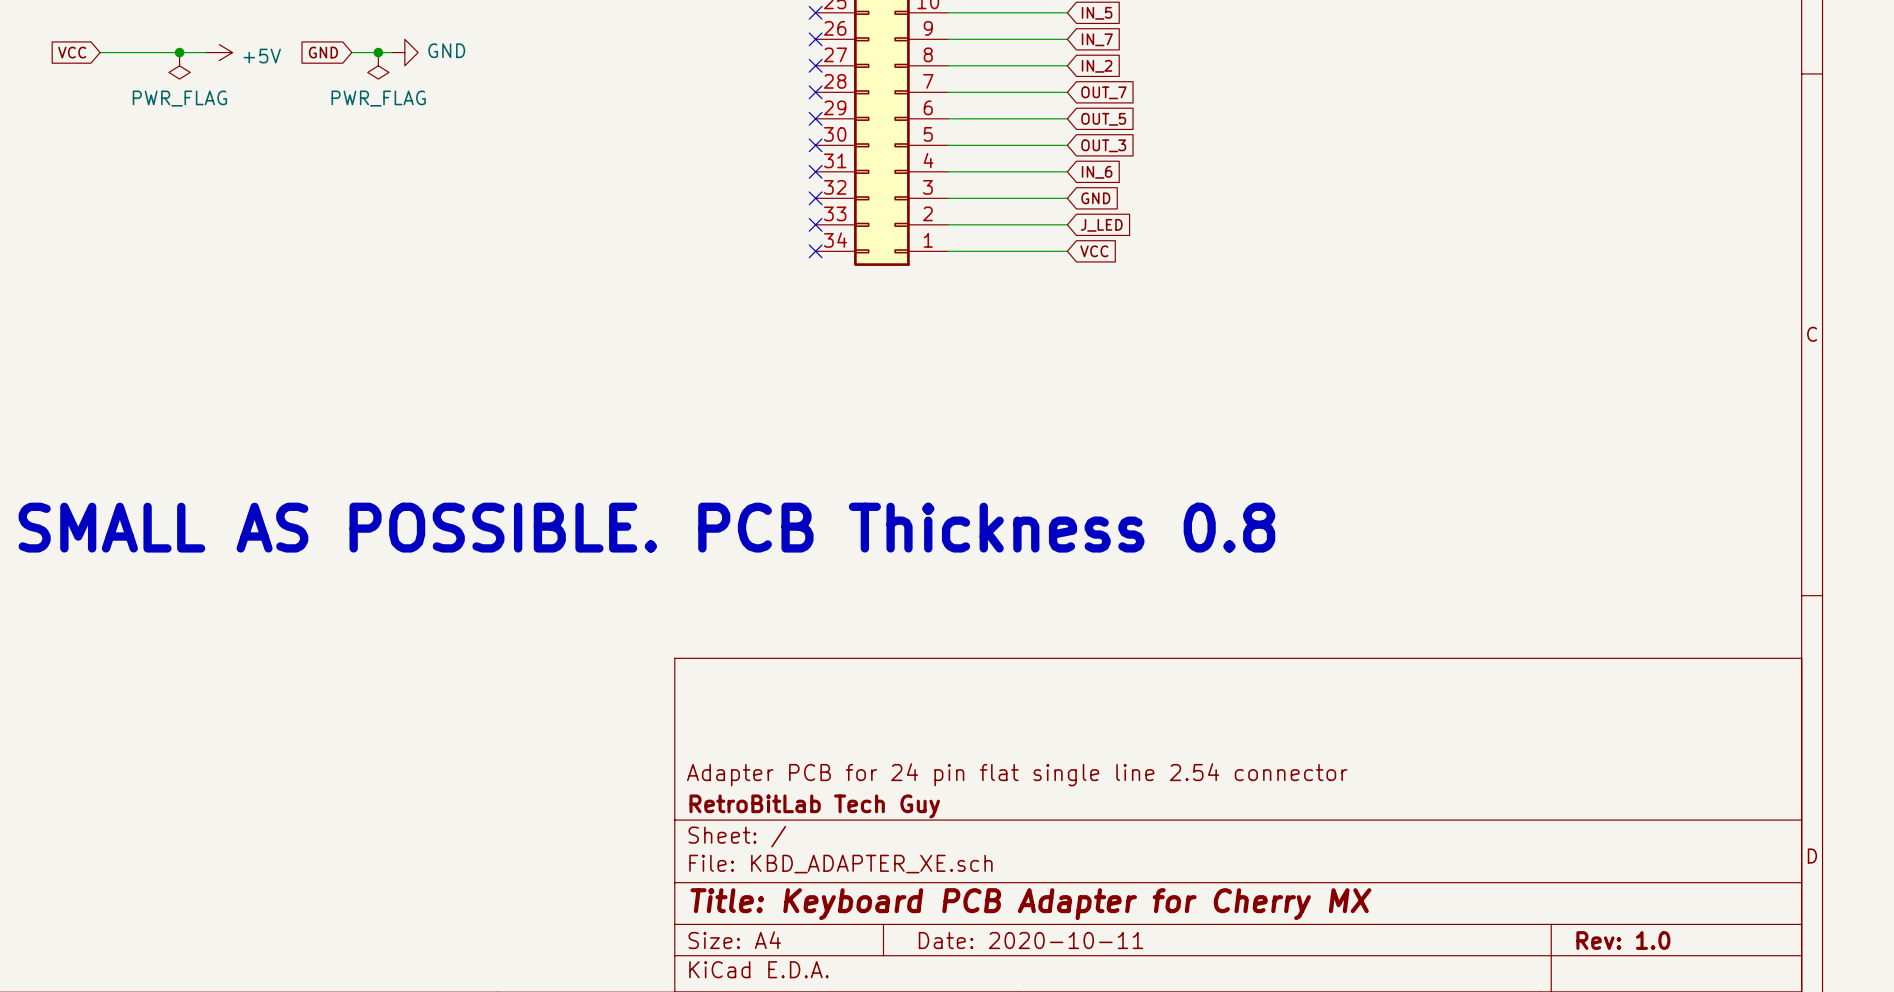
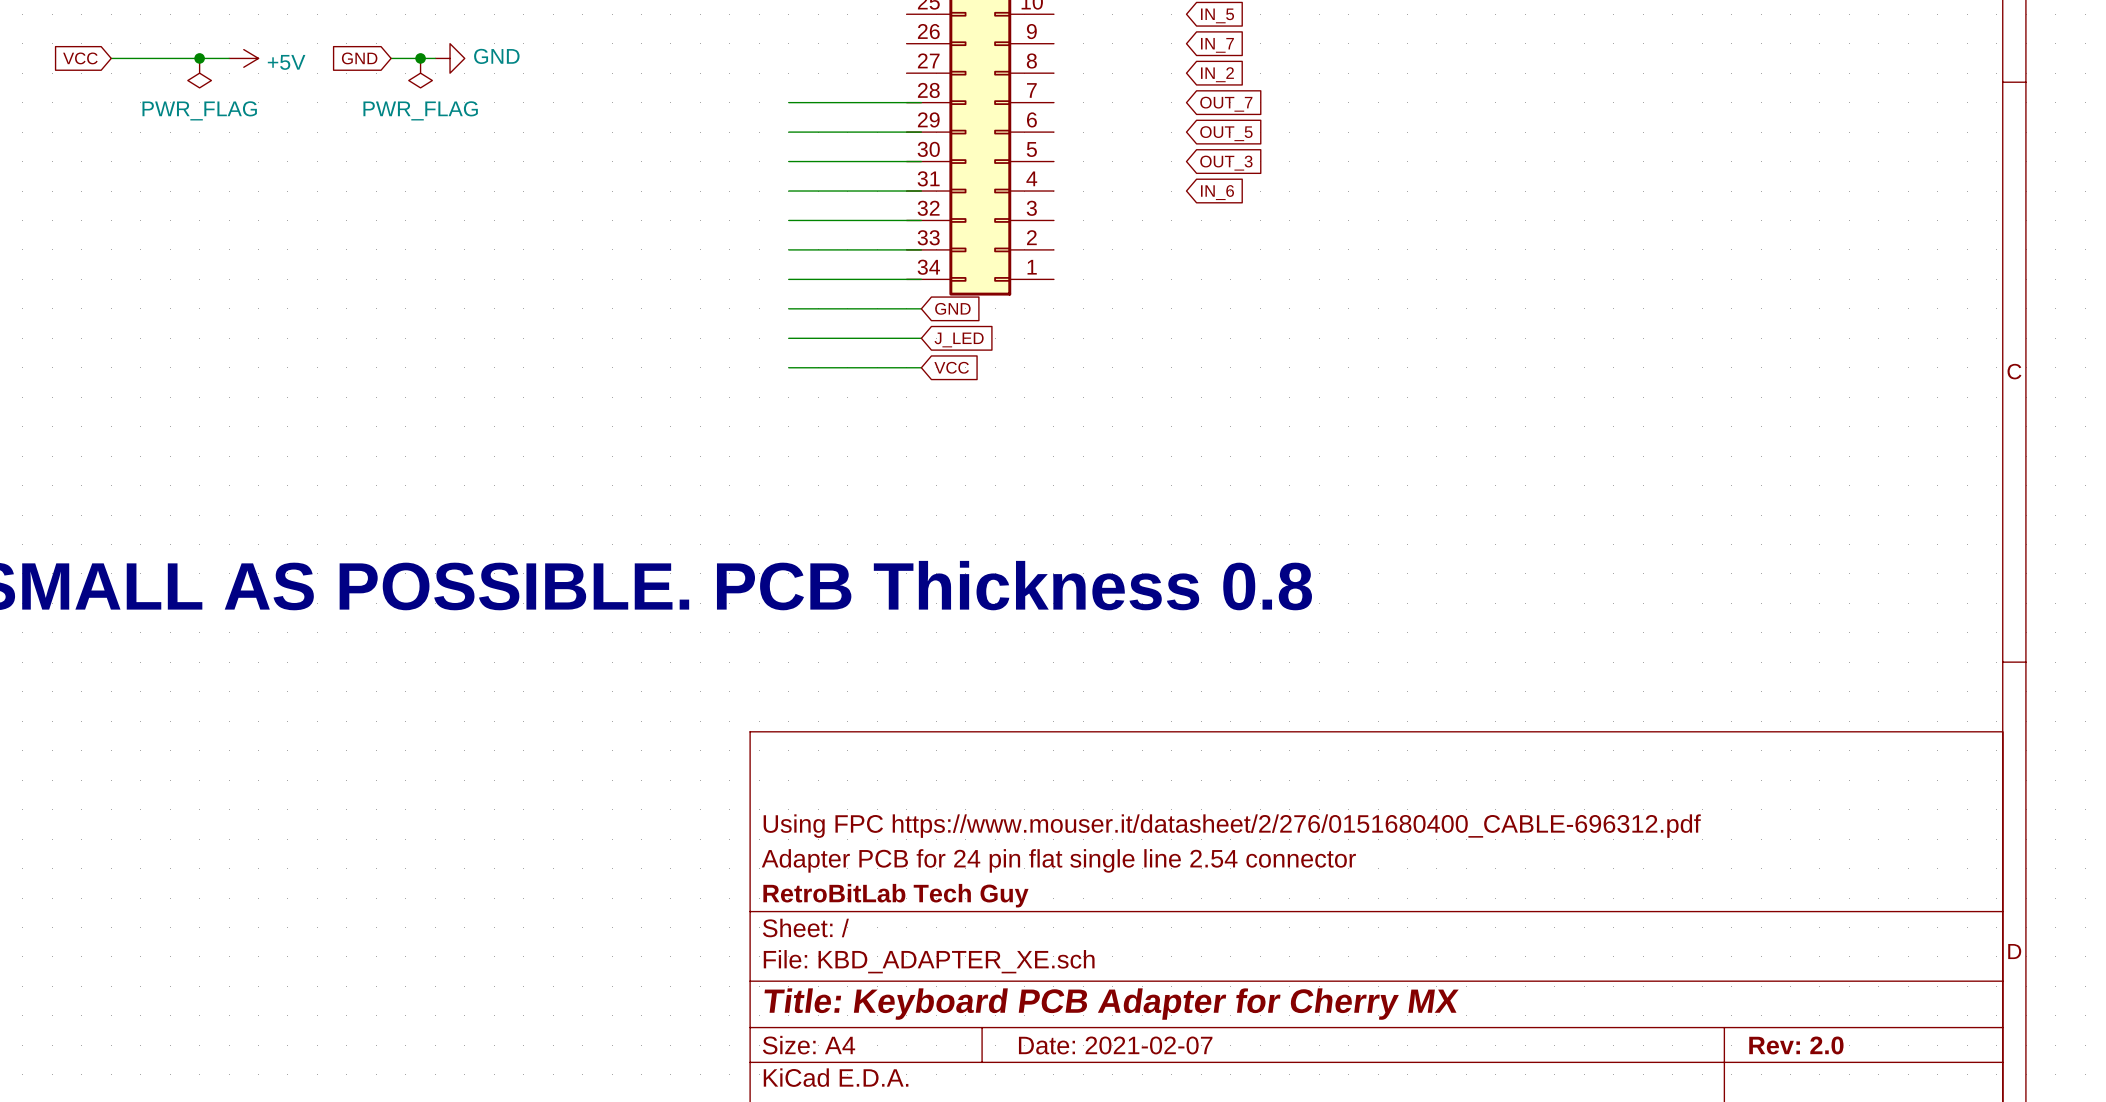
no-connect mark: (815, 12) -> none
wire: (948, 12) (1067, 12) -> (788, 102) (921, 102)
no-connect mark: (815, 39) -> none
wire: (948, 39) (1067, 39) -> (788, 132) (921, 132)
no-connect mark: (815, 65) -> none
wire: (948, 65) (1067, 65) -> (788, 161) (921, 161)
no-connect mark: (815, 92) -> none
wire: (948, 92) (1067, 92) -> (788, 191) (921, 191)
no-connect mark: (815, 118) -> none
wire: (948, 118) (1067, 118) -> (788, 220) (921, 220)
no-connect mark: (815, 145) -> none
wire: (948, 145) (1067, 145) -> (788, 249) (921, 249)
no-connect mark: (815, 171) -> none
wire: (948, 171) (1067, 171) -> (788, 279) (921, 279)
no-connect mark: (815, 198) -> none
wire: (948, 198) (1067, 198) -> (788, 308) (921, 308)
global label position: GND (1095, 198) -> GND (952, 308)
no-connect mark: (815, 224) -> none
wire: (948, 224) (1067, 224) -> (788, 338) (921, 338)
global label position: J_LED (1101, 225) -> J_LED (959, 339)
no-connect mark: (815, 251) -> none
wire: (948, 251) (1067, 251) -> (788, 367) (921, 367)
global label position: VCC (1094, 251) -> VCC (951, 367)
title block: none -> Using FPC https://www.mouser.it/datasheet/2/276/0151680400_CABLE-696312.pdf (1232, 826)
title block: Date: 2020-10-11 (1030, 940) -> Date: 2021-02-07 (1115, 1045)
title block: Rev: 1.0 (1623, 940) -> Rev: 2.0 (1796, 1045)

